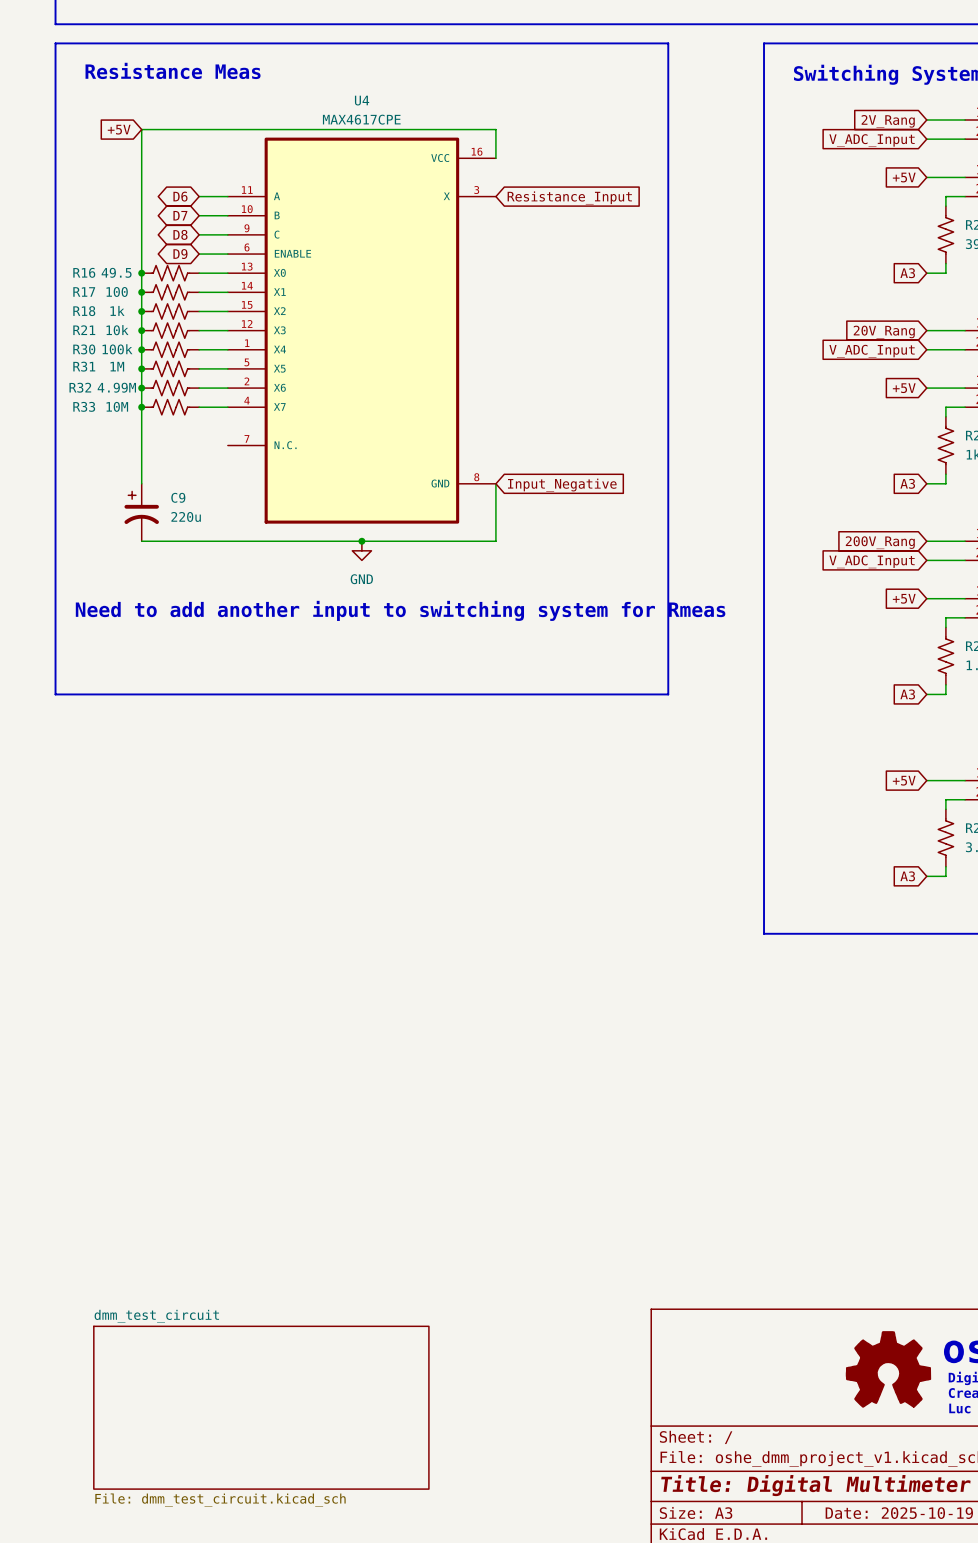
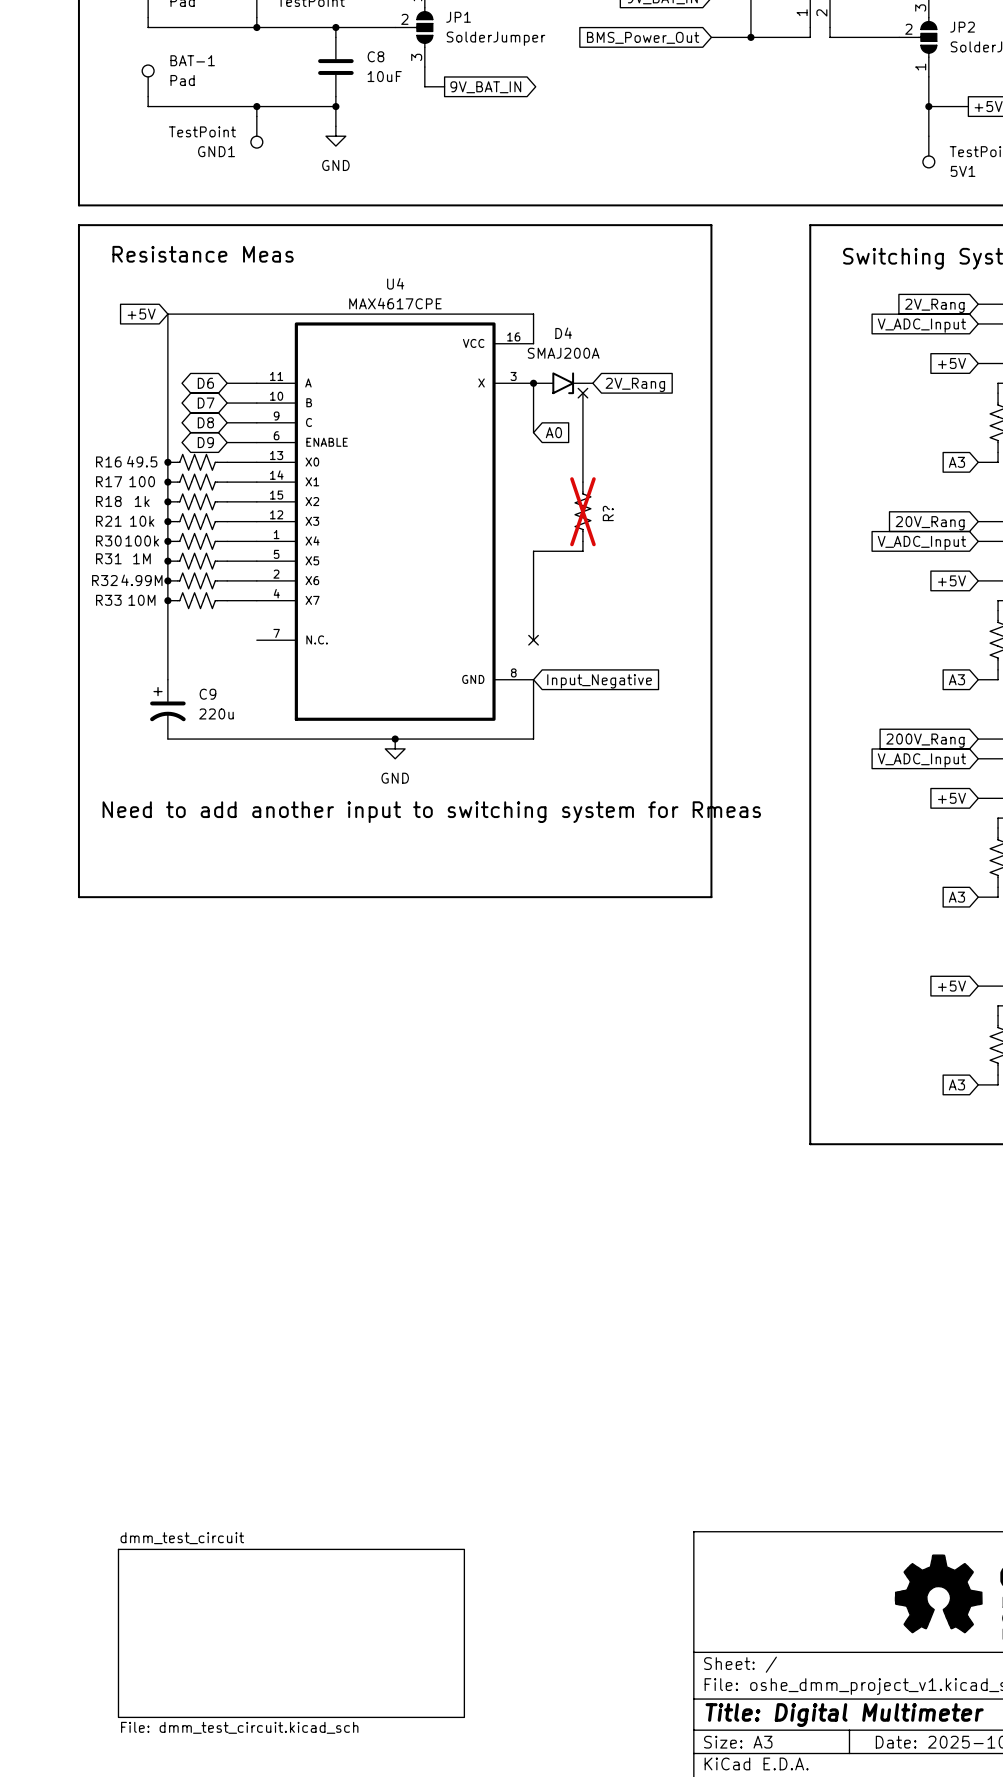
wire: none -> (533, 383) (533, 432)
junction: none -> (533, 383)
D4: none -> SMAJ200A (563, 383)
global label: Resistance_Input (569, 197) -> none
global label: none -> 2V_Rang (635, 384)
wire: none -> (582, 393) (582, 482)
no-connect mark: none -> (582, 393)
global label: none -> A0 (553, 432)
part: none -> R? (582, 511)
wire: none -> (582, 541) (582, 551) (533, 551) (533, 640)
no-connect mark: none -> (533, 640)

